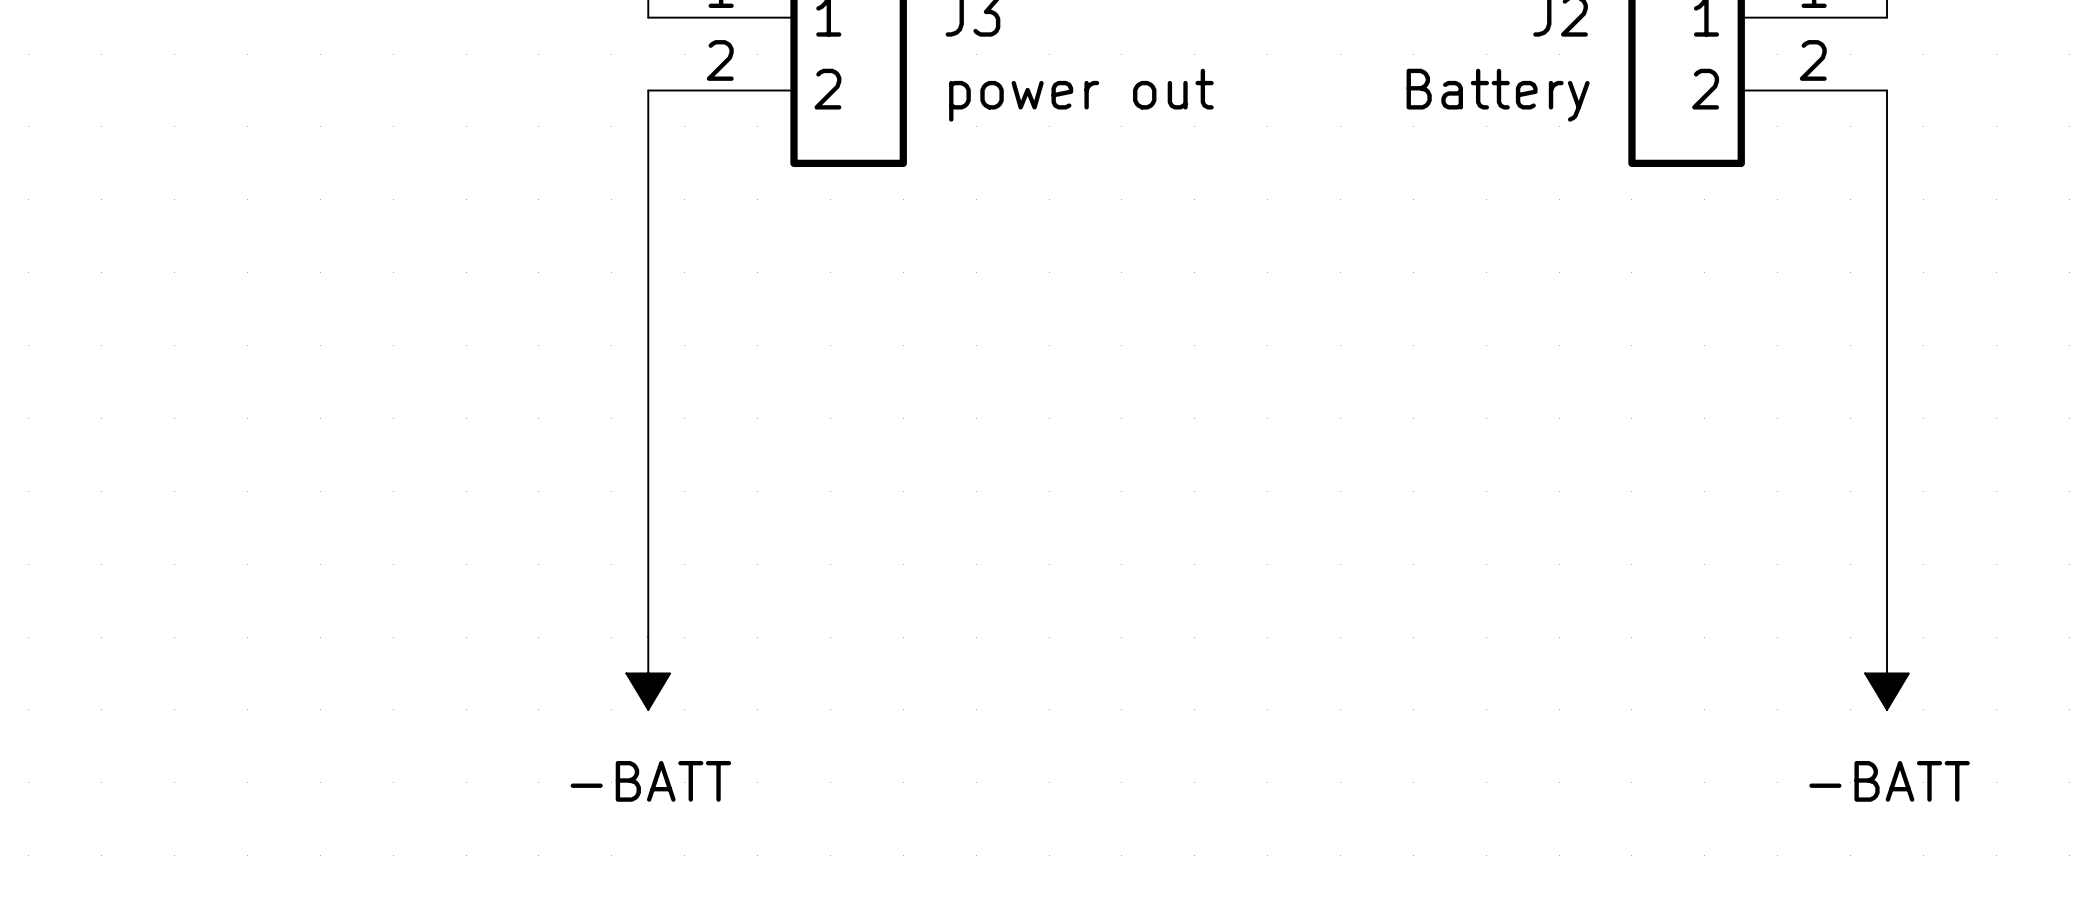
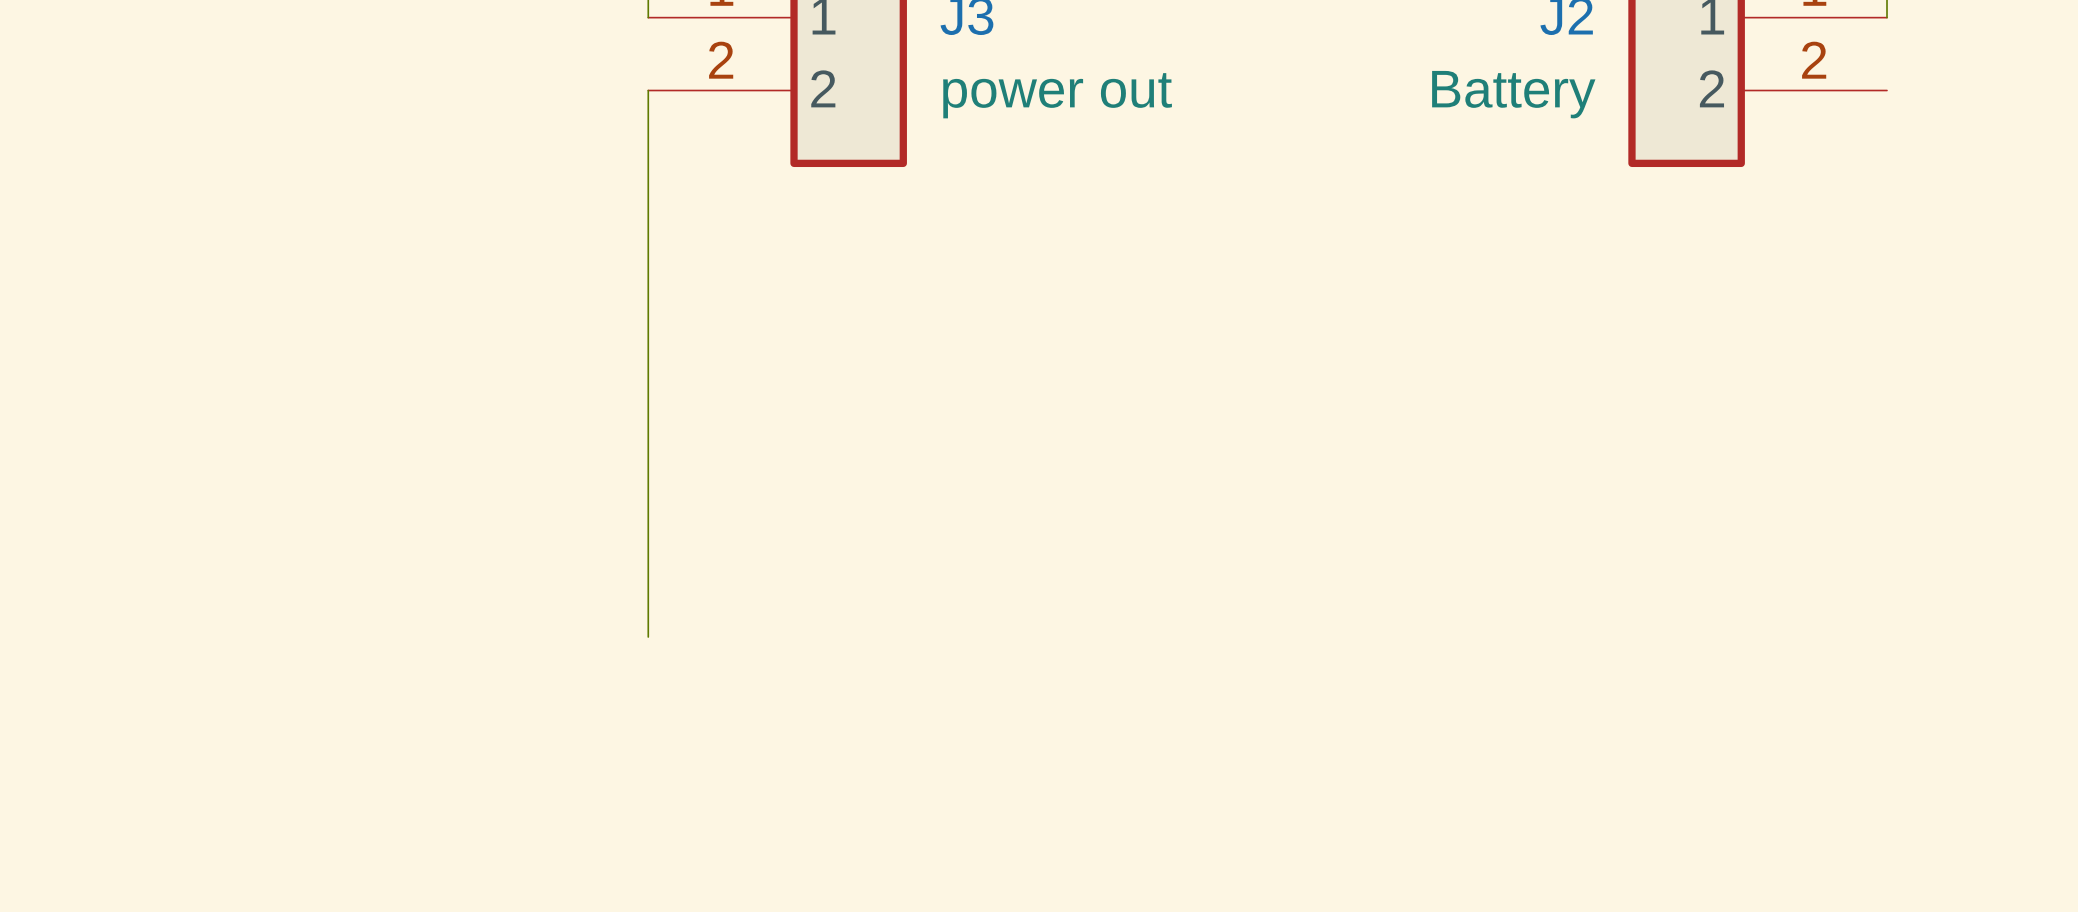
wire: (1887, 90) (1887, 637) -> none
power symbol: -BATT (648, 673) -> none
power symbol: -BATT (1887, 673) -> none

